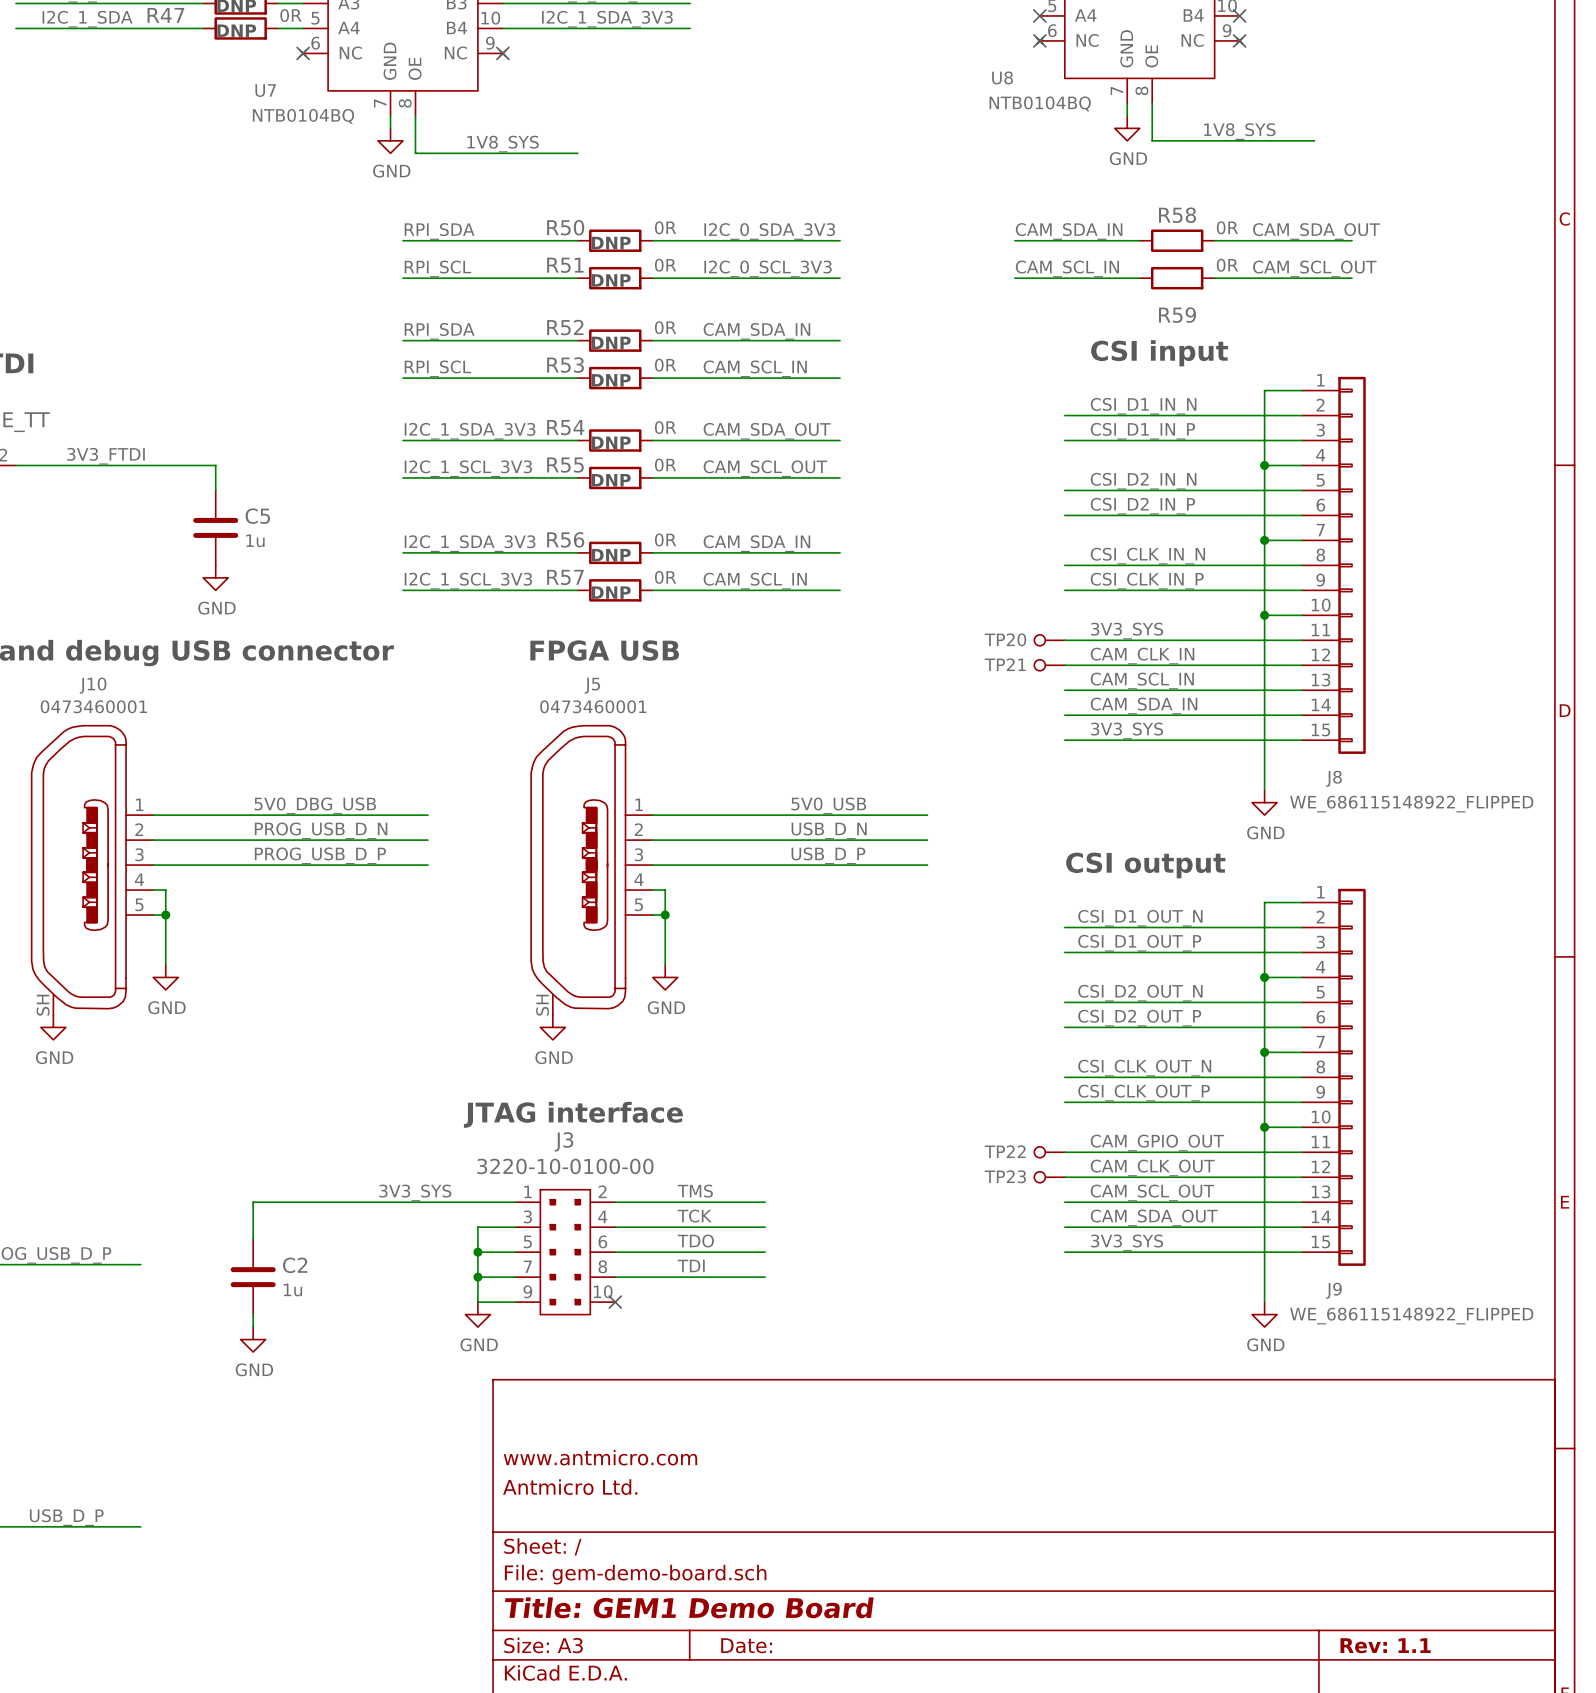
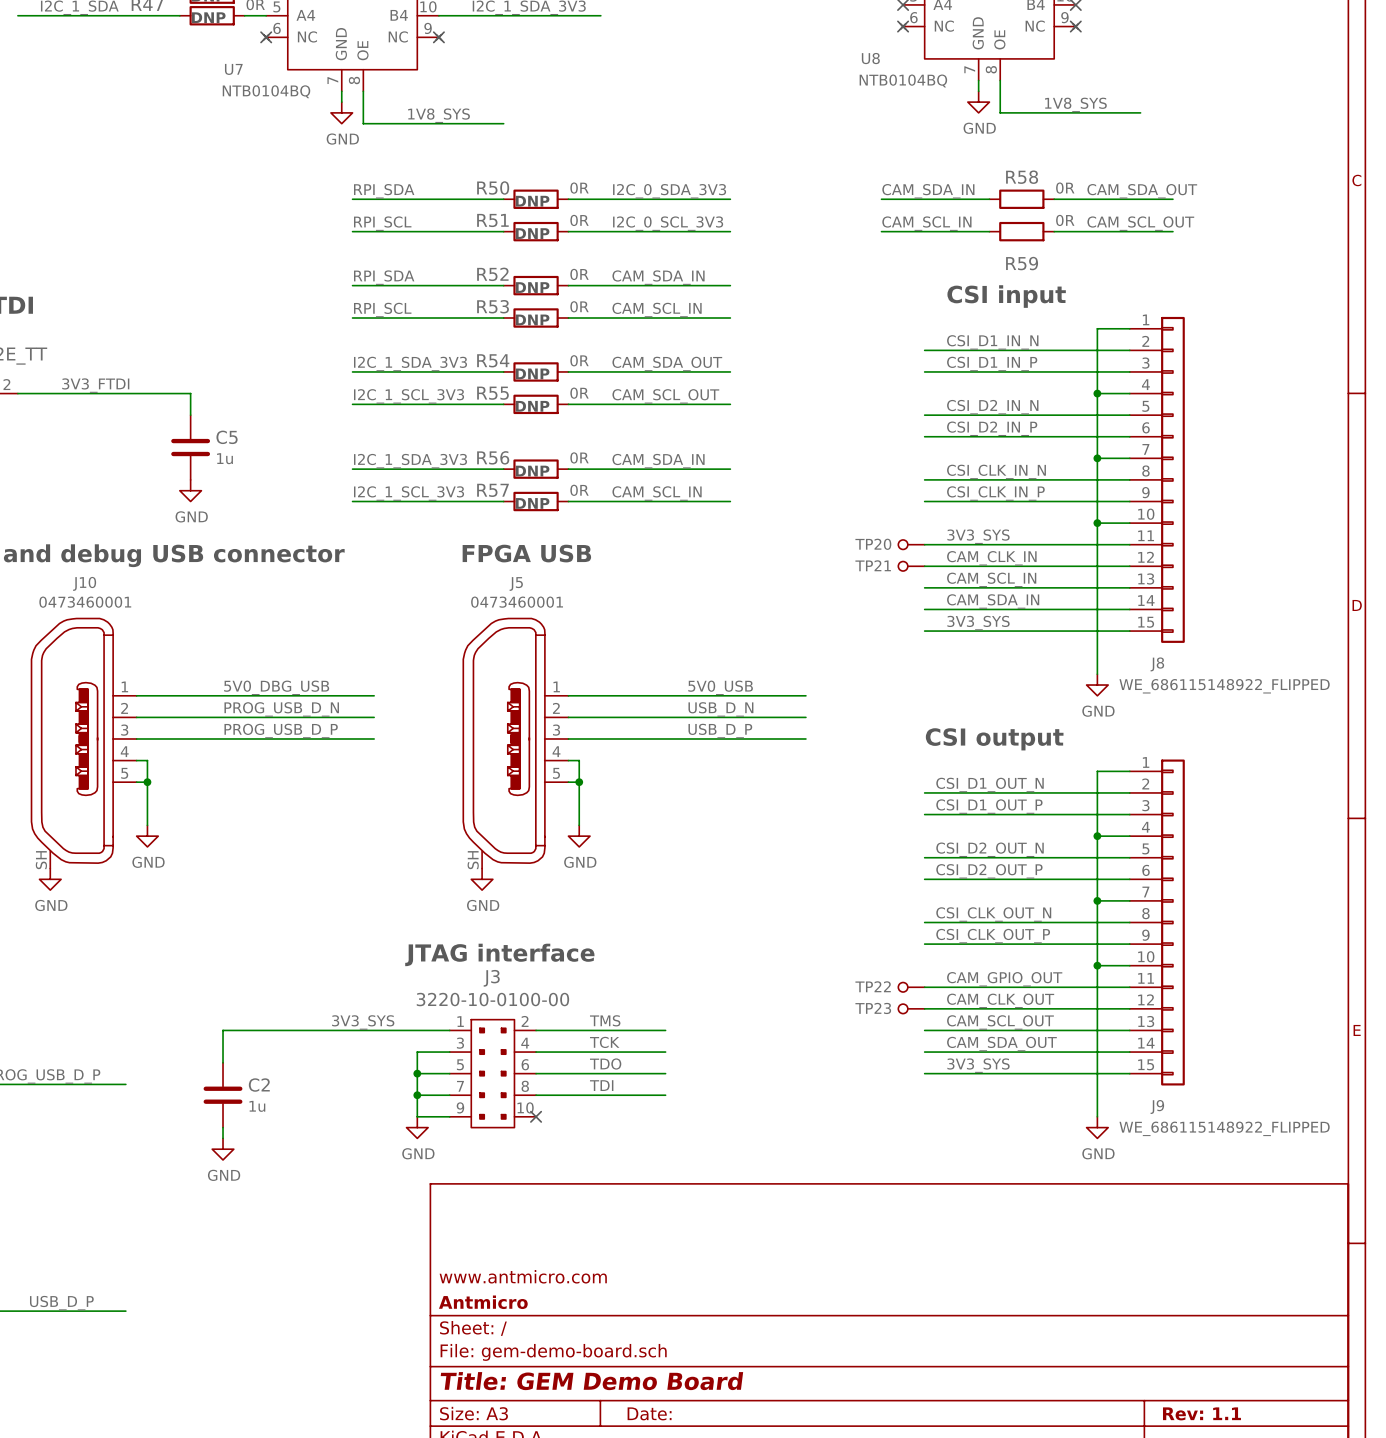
title block: www.antmicro.com (600, 1457) -> none
title block: Antmicro Ltd. (570, 1487) -> www.antmicro.com (523, 1276)
title block: none -> Antmicro (483, 1302)
title block: Title: GEM1 Demo Board (689, 1607) -> Title: GEM Demo Board (591, 1381)

